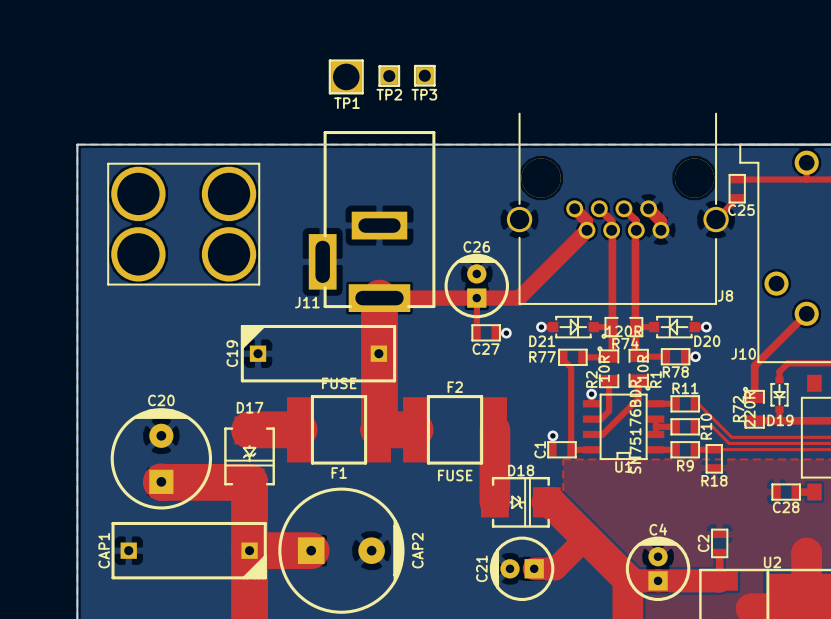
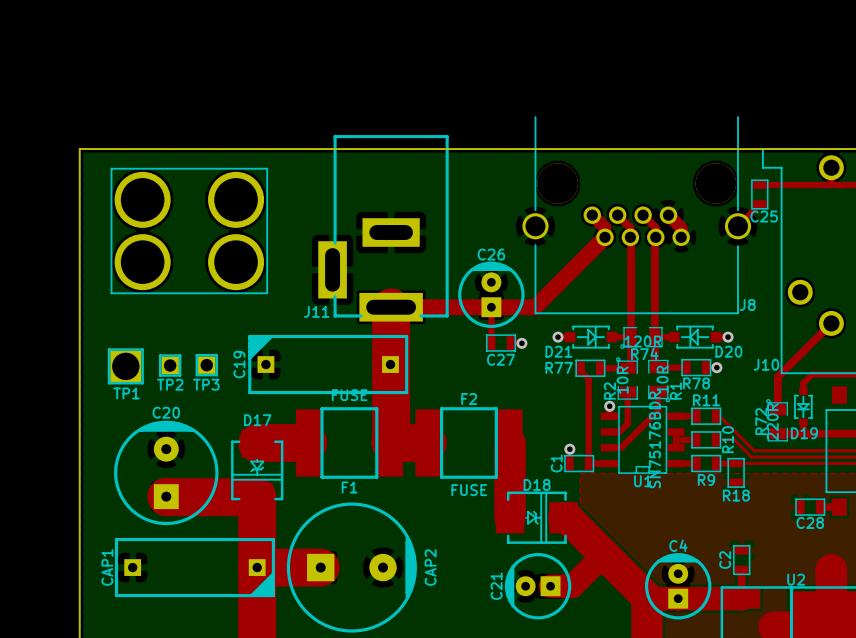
TP3 position: (424, 75) -> (206, 365)
TP1 position: (346, 76) -> (125, 366)
TP2 position: (389, 76) -> (170, 365)

